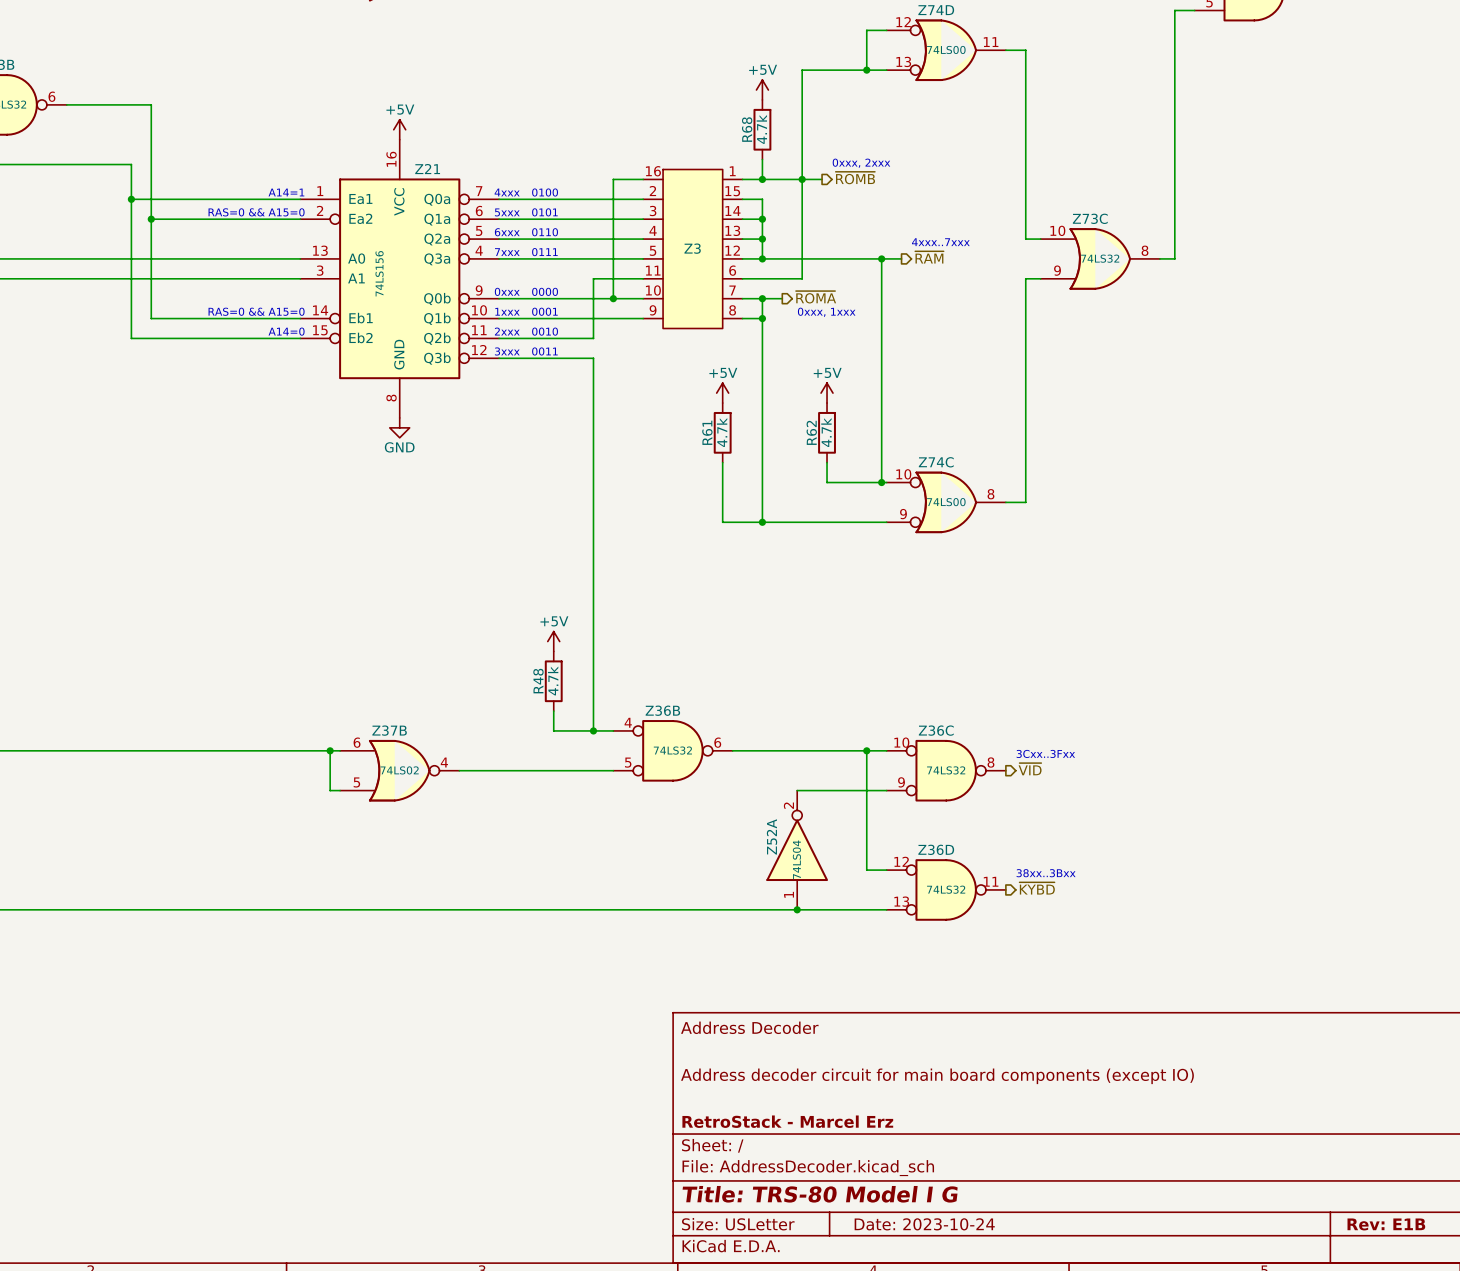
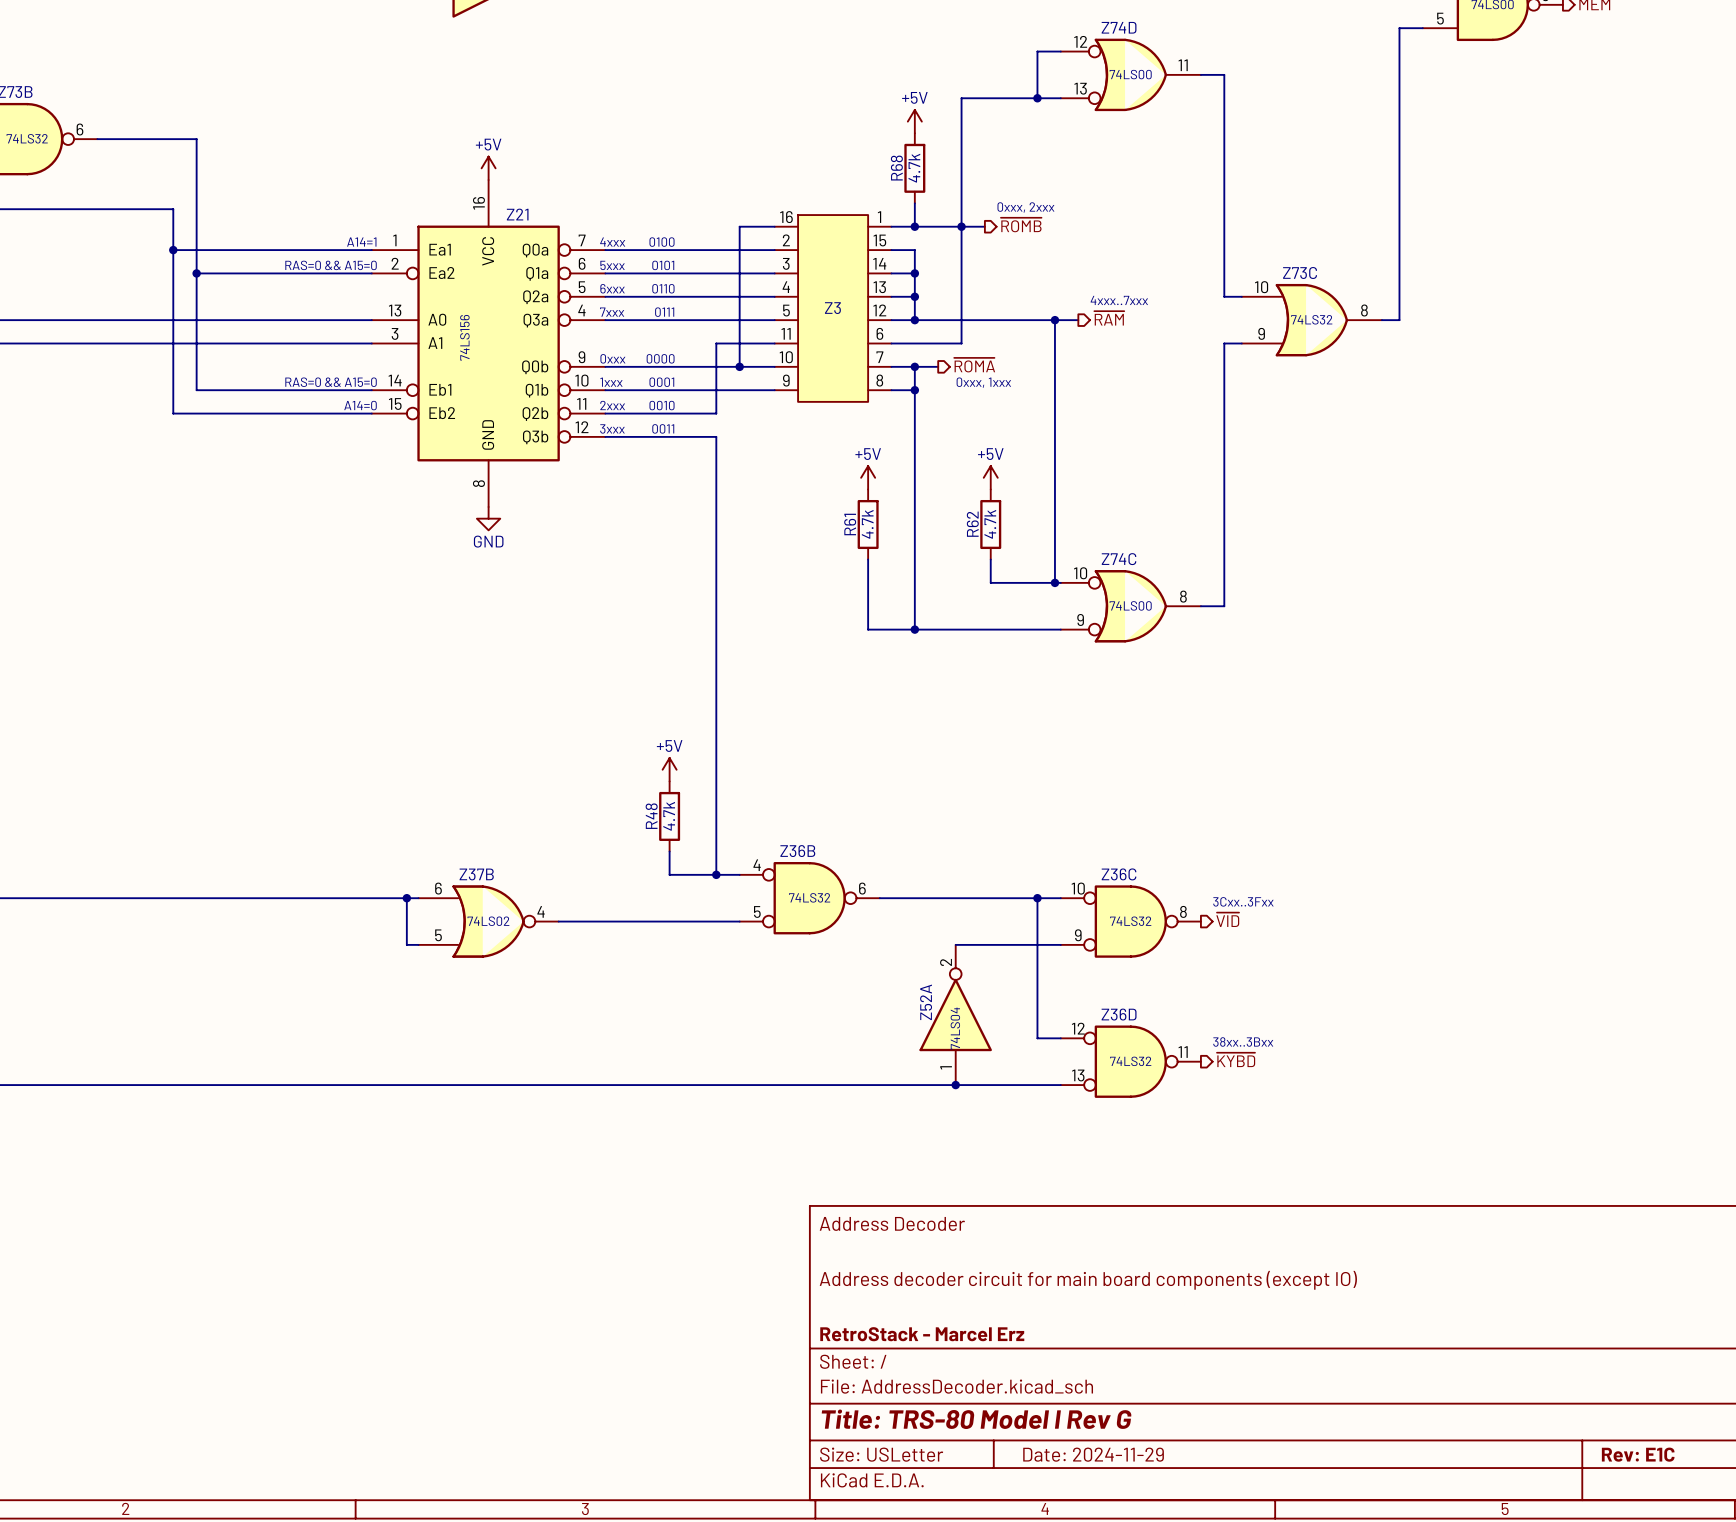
title block: Title: TRS-80 Model I G (820, 1194) -> Title: TRS-80 Model I Rev G (976, 1419)
title block: Date: 2023-10-24 (924, 1224) -> Date: 2024-11-29 (1093, 1454)
title block: Rev: E1B (1386, 1224) -> Rev: E1C (1638, 1454)

